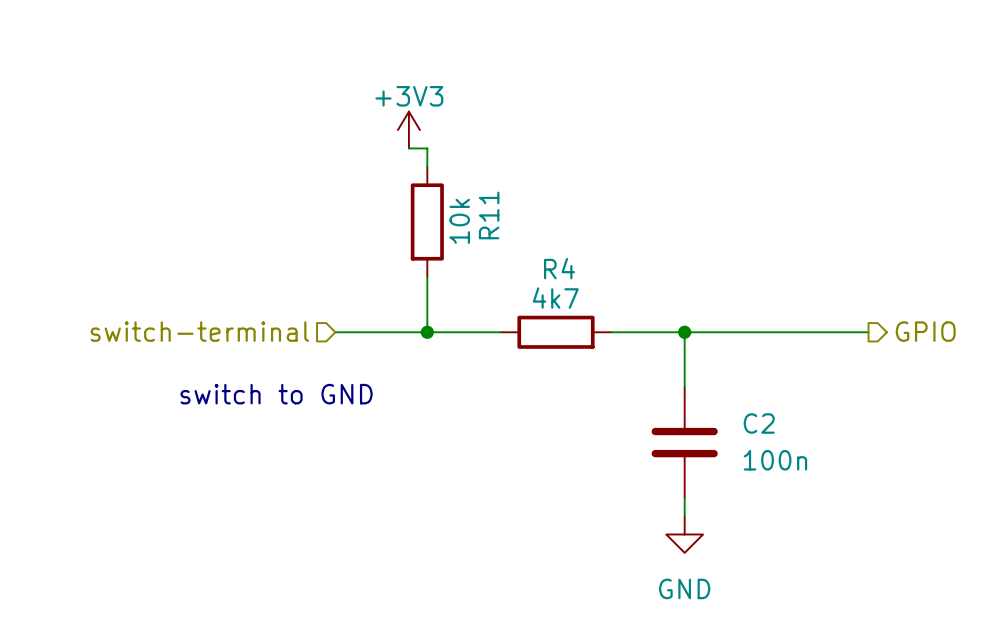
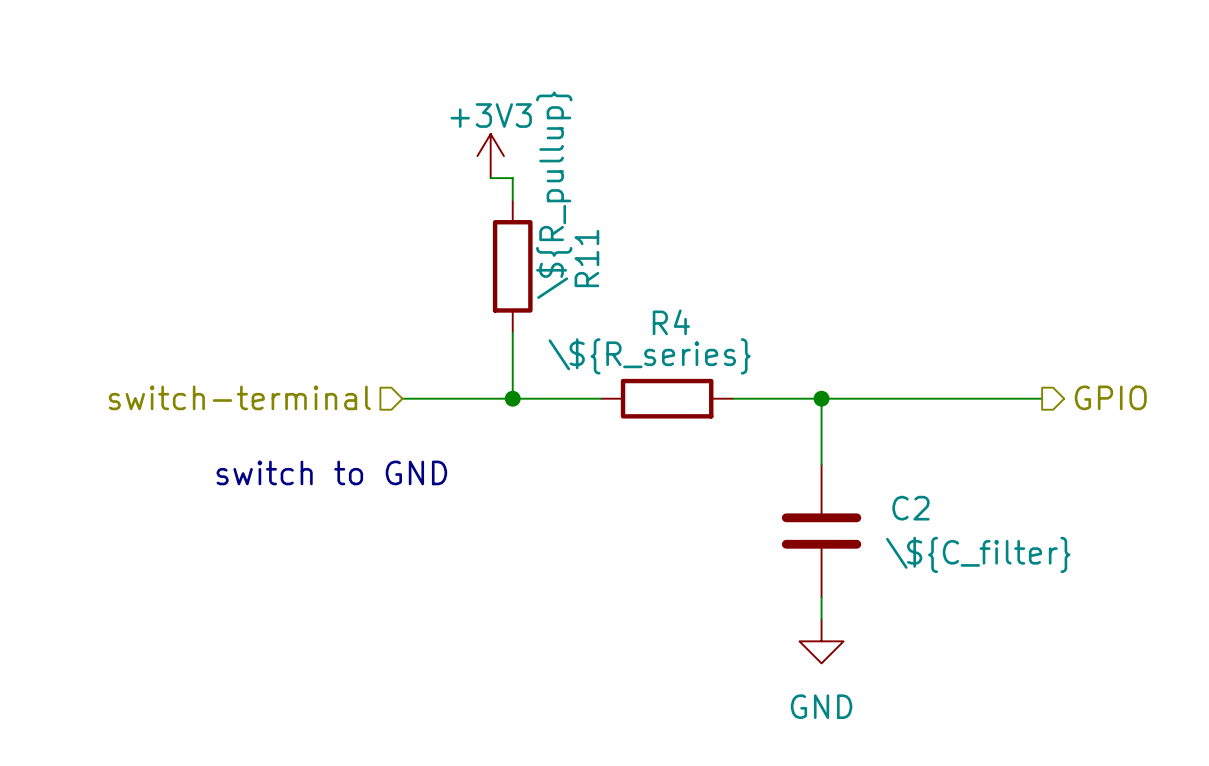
R11 value: 10k (459, 221) -> \${R_pullup} (554, 195)
R4 value: 4k7 (555, 298) -> \${R_series} (649, 356)
C2 value: 100n (775, 460) -> \${C_filter} (978, 554)

